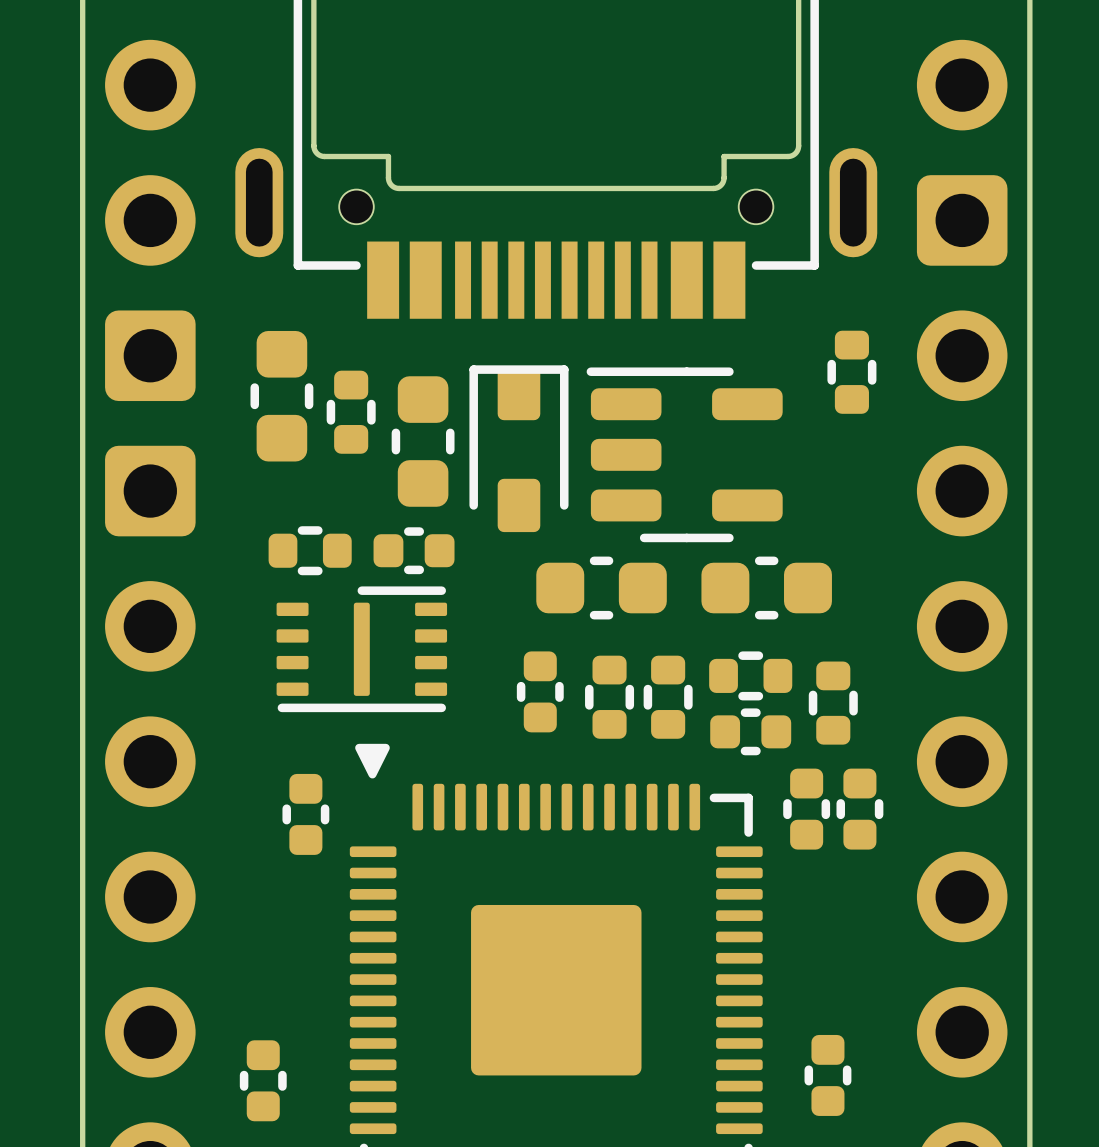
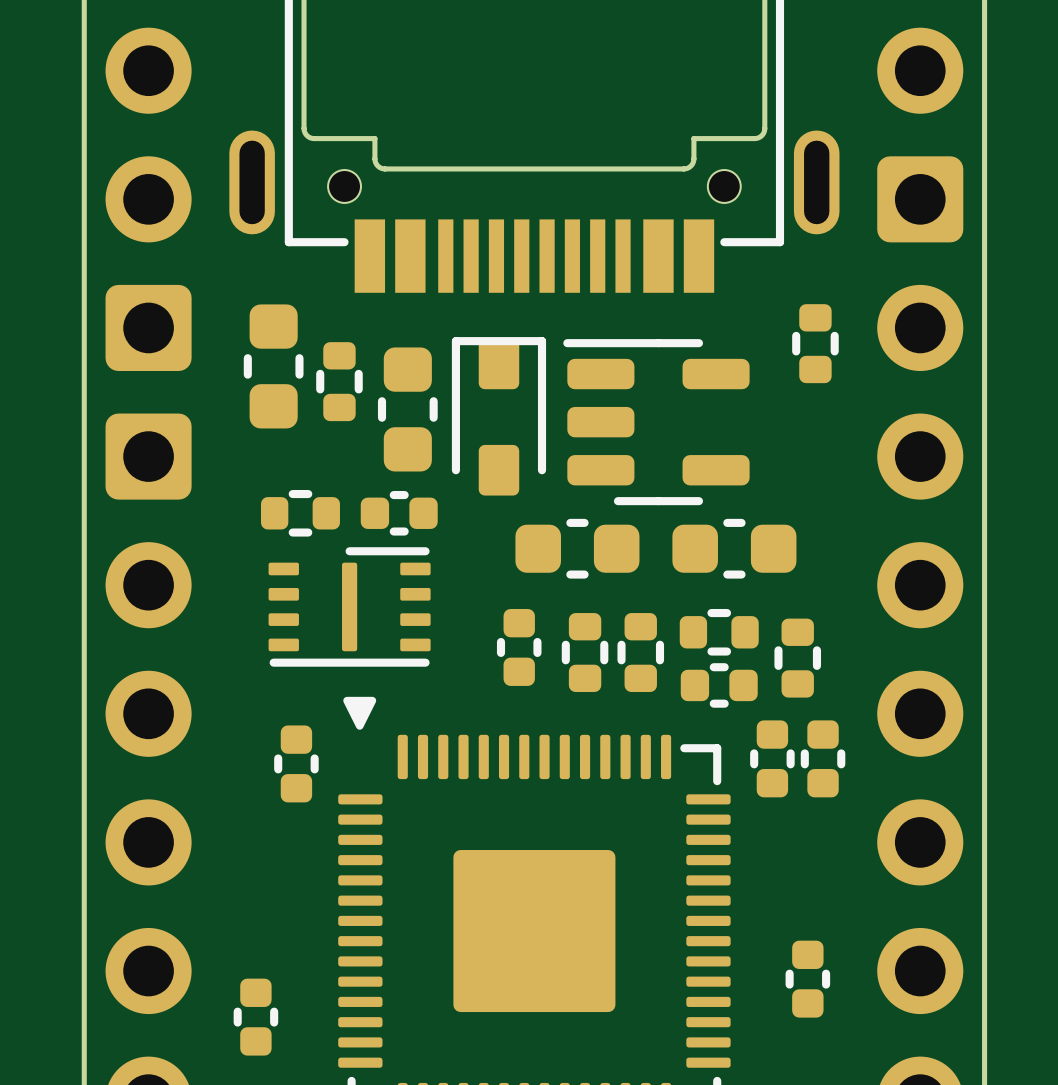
part position: (827, 1075) -> (807, 979)

